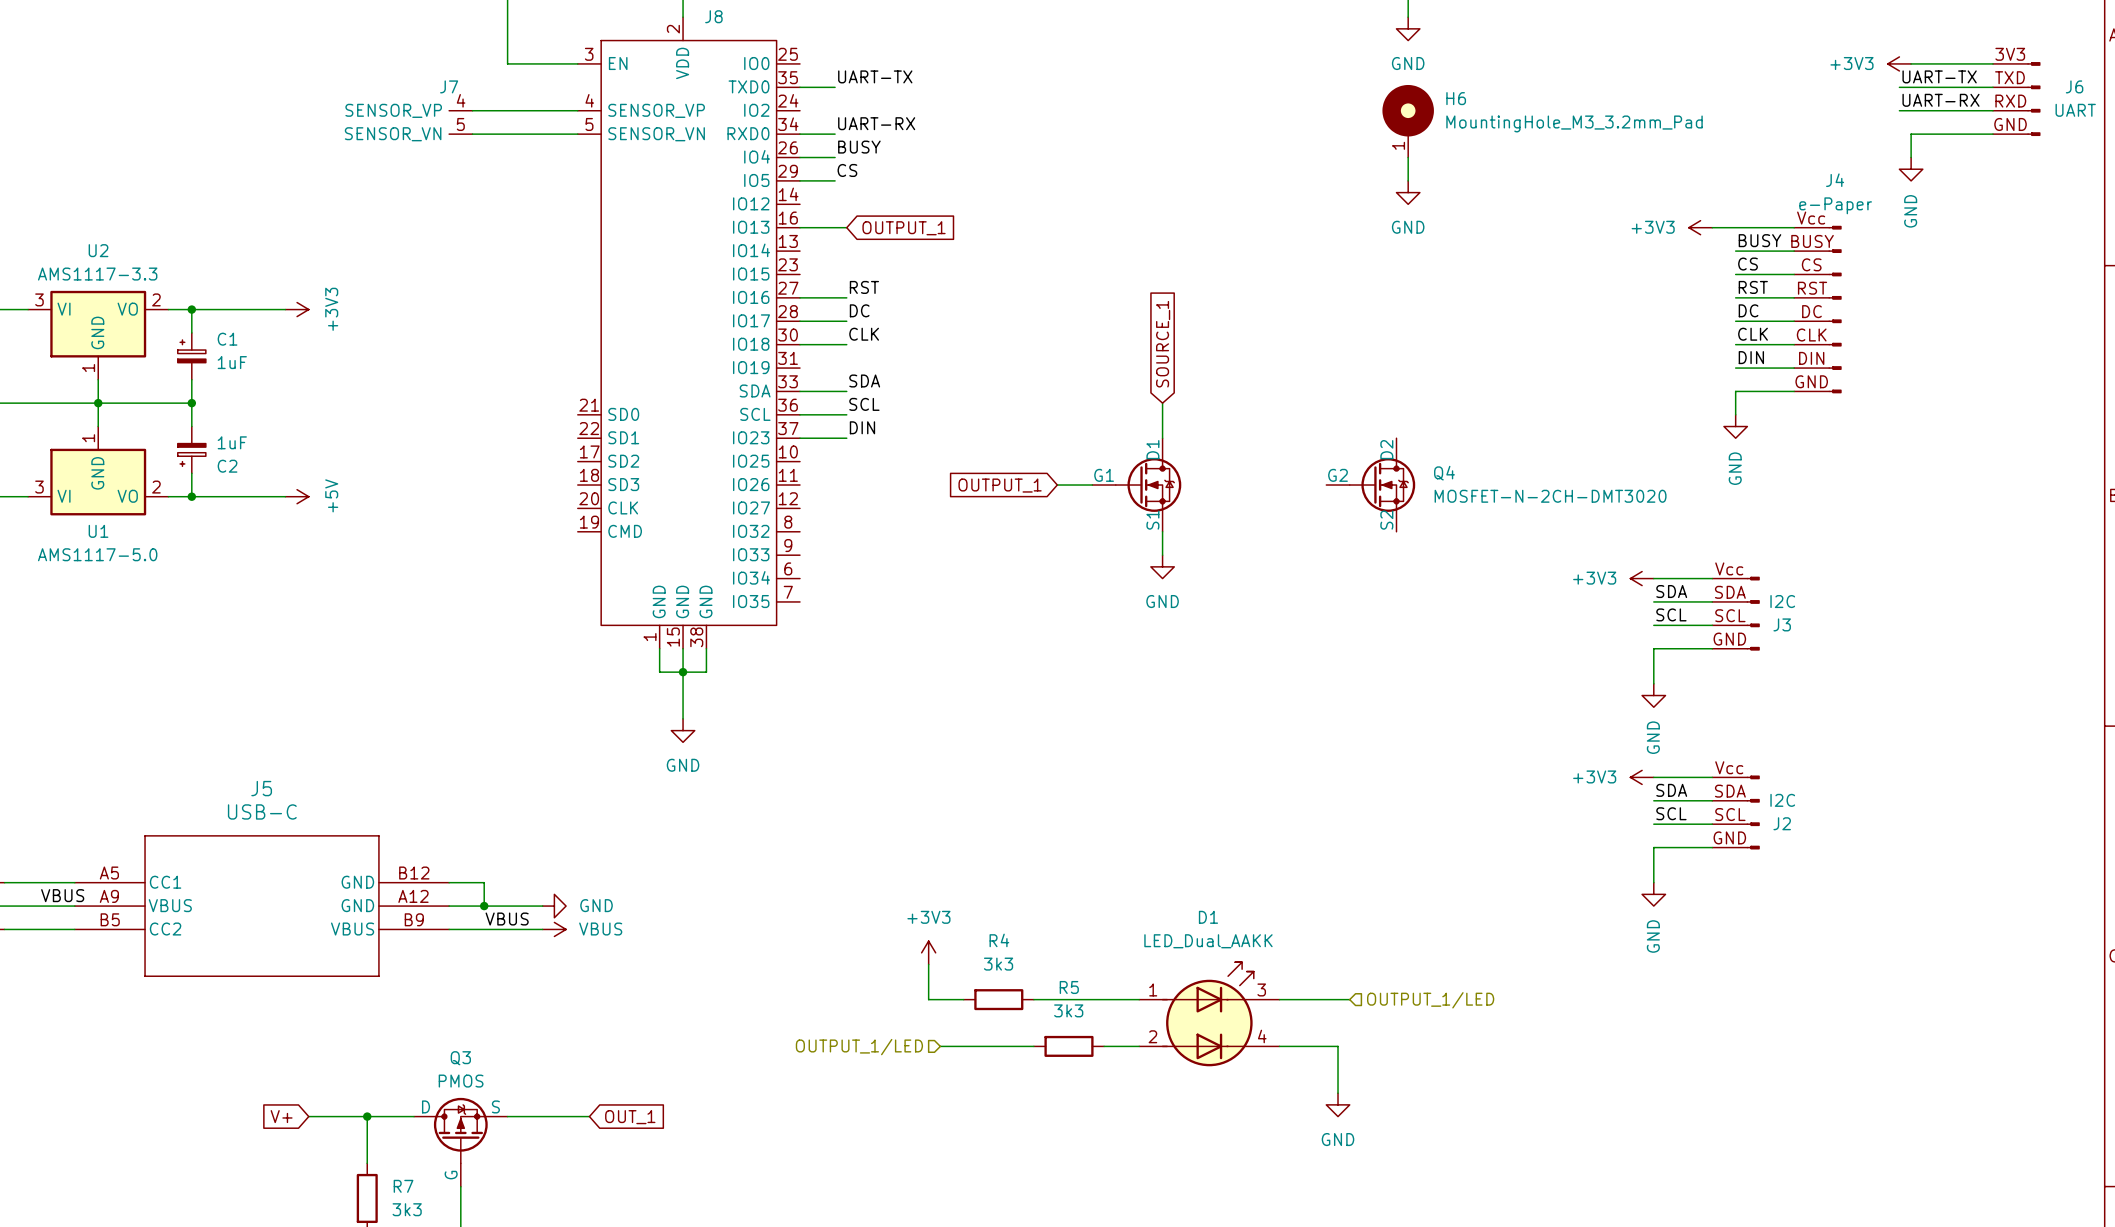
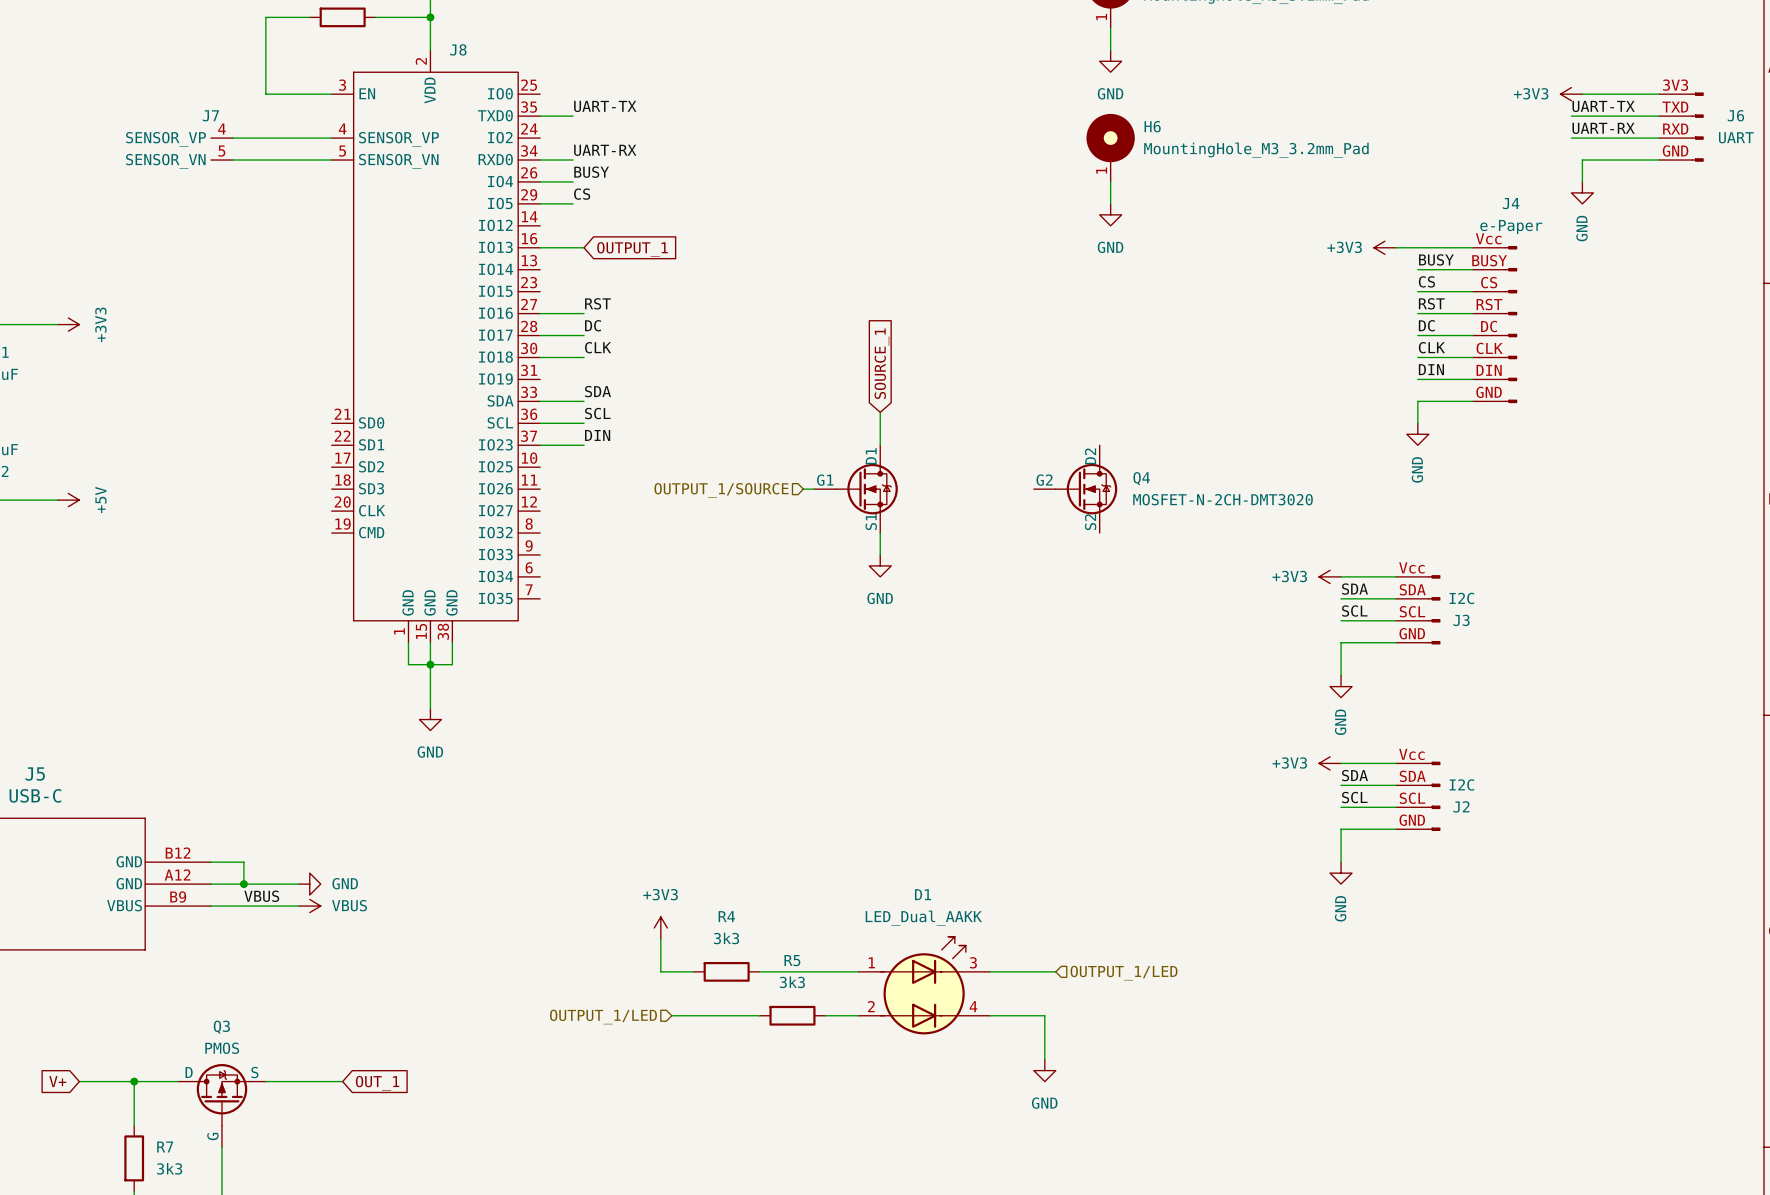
hierarchical label: none -> OUTPUT_1/SOURCE (721, 490)
global label: OUTPUT_1 (1000, 485) -> none
wire: (1057, 485) (1080, 485) -> none

